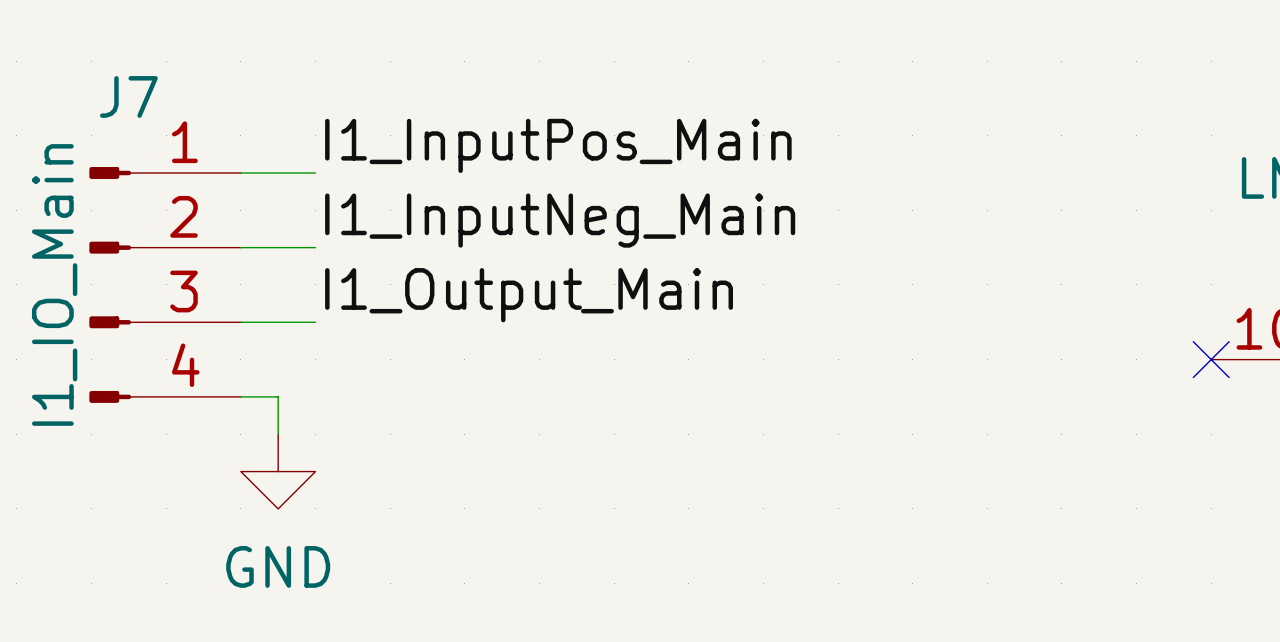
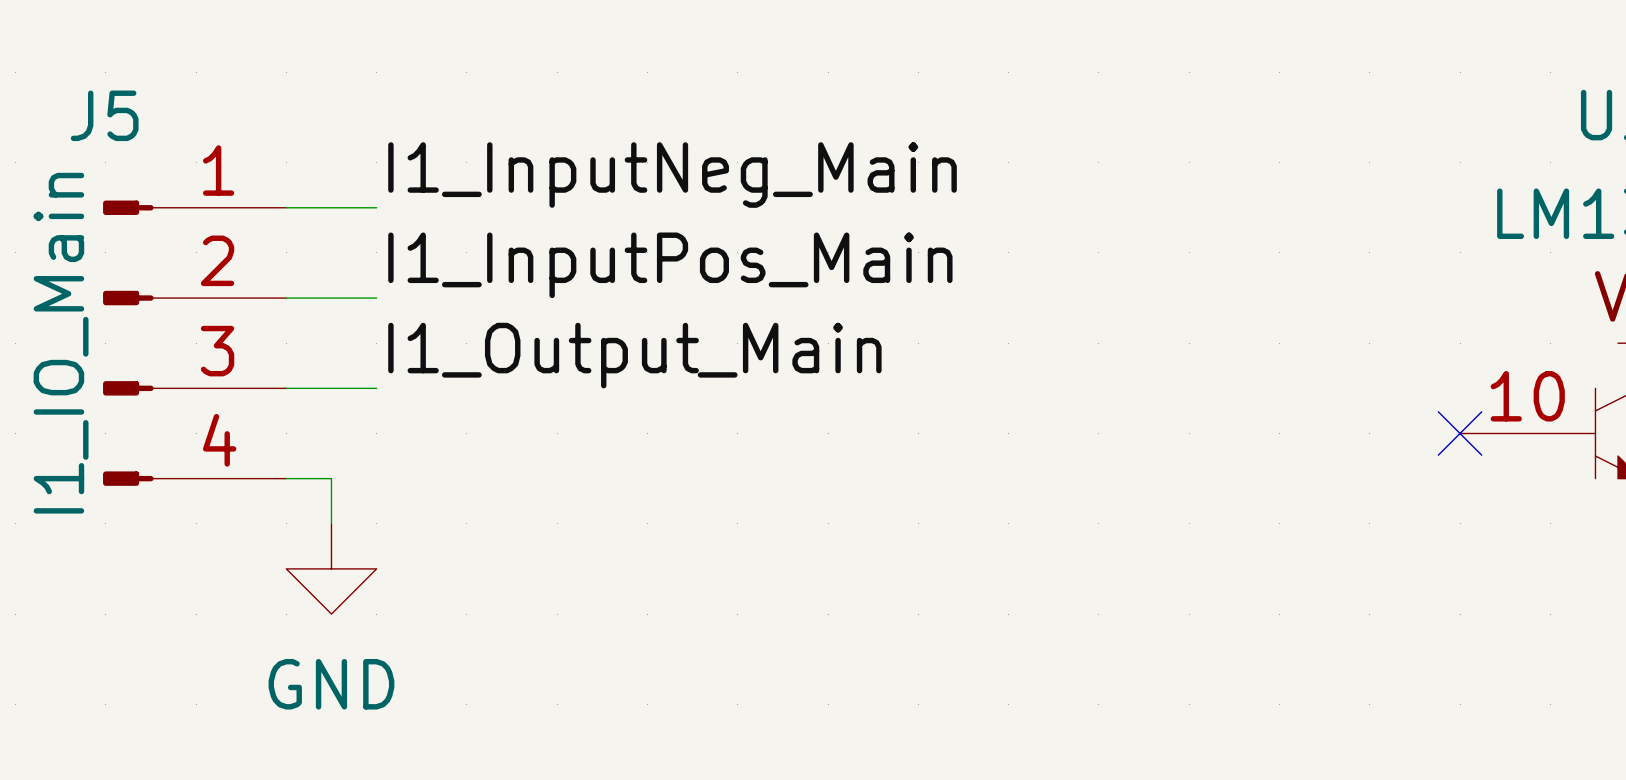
J7 name: J7 (128, 96) -> J5 (104, 115)
label: I1_InputPos_Main (558, 145) -> I1_InputNeg_Main (672, 175)
label: I1_InputNeg_Main (560, 220) -> I1_InputPos_Main (670, 265)

